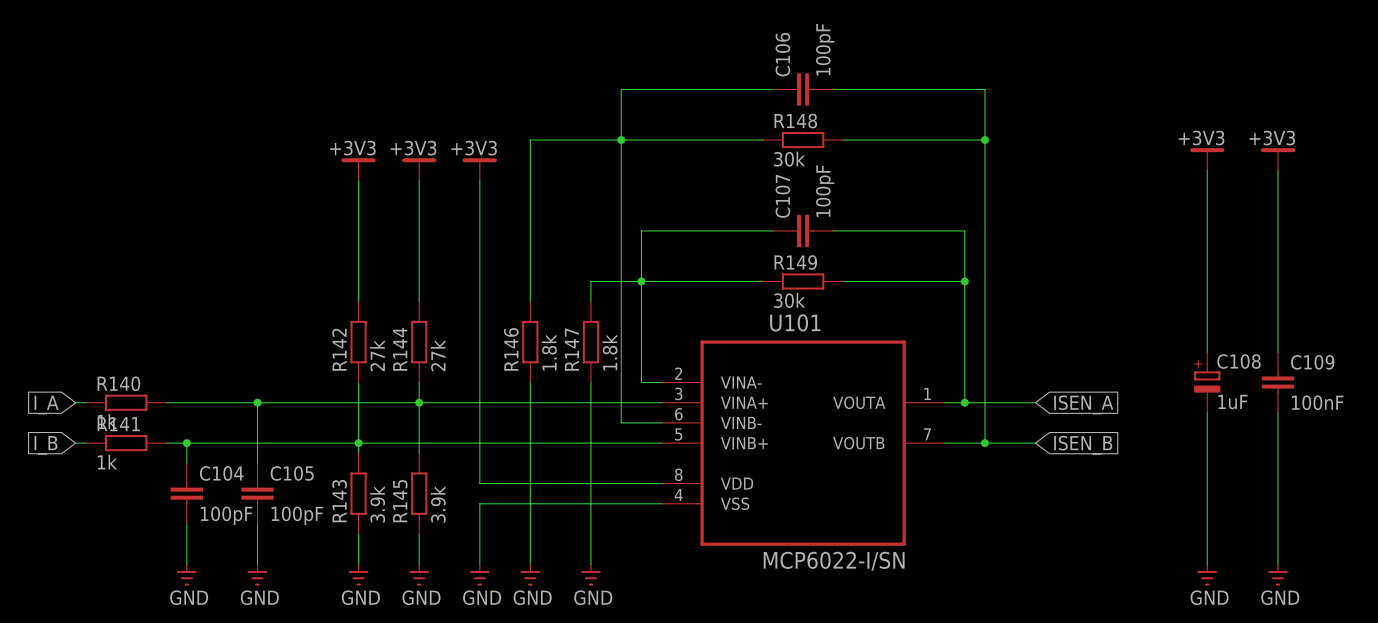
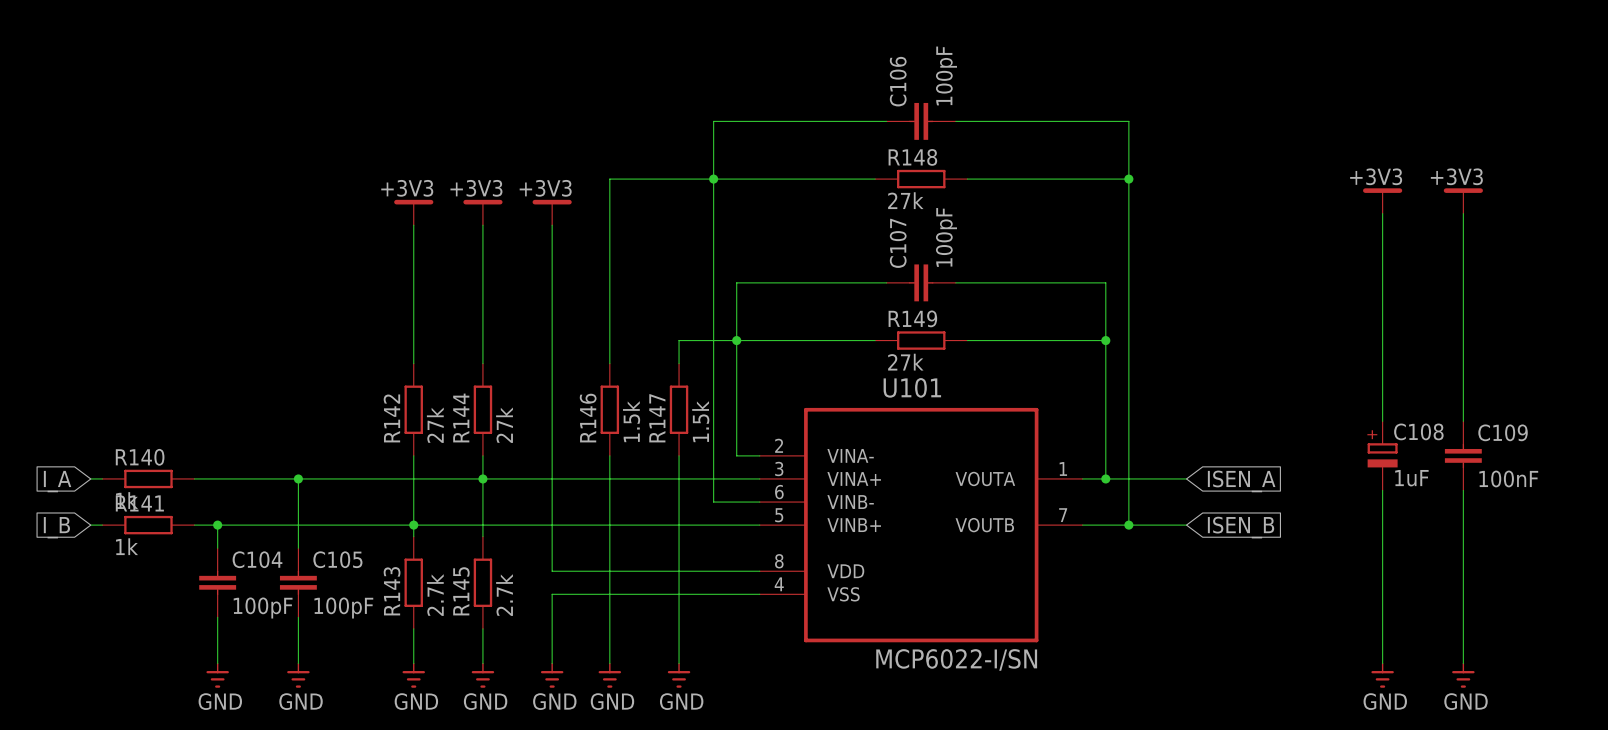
R148 value: 30k (789, 159) -> 27k (905, 200)
R149 value: 30k (789, 300) -> 27k (905, 362)
R146 value: 1.8k (549, 352) -> 1.5k (631, 421)
R147 value: 1.8k (609, 352) -> 1.5k (700, 421)
R143 value: 3.9k (377, 504) -> 2.7k (435, 595)
R145 value: 3.9k (438, 504) -> 2.7k (504, 595)

